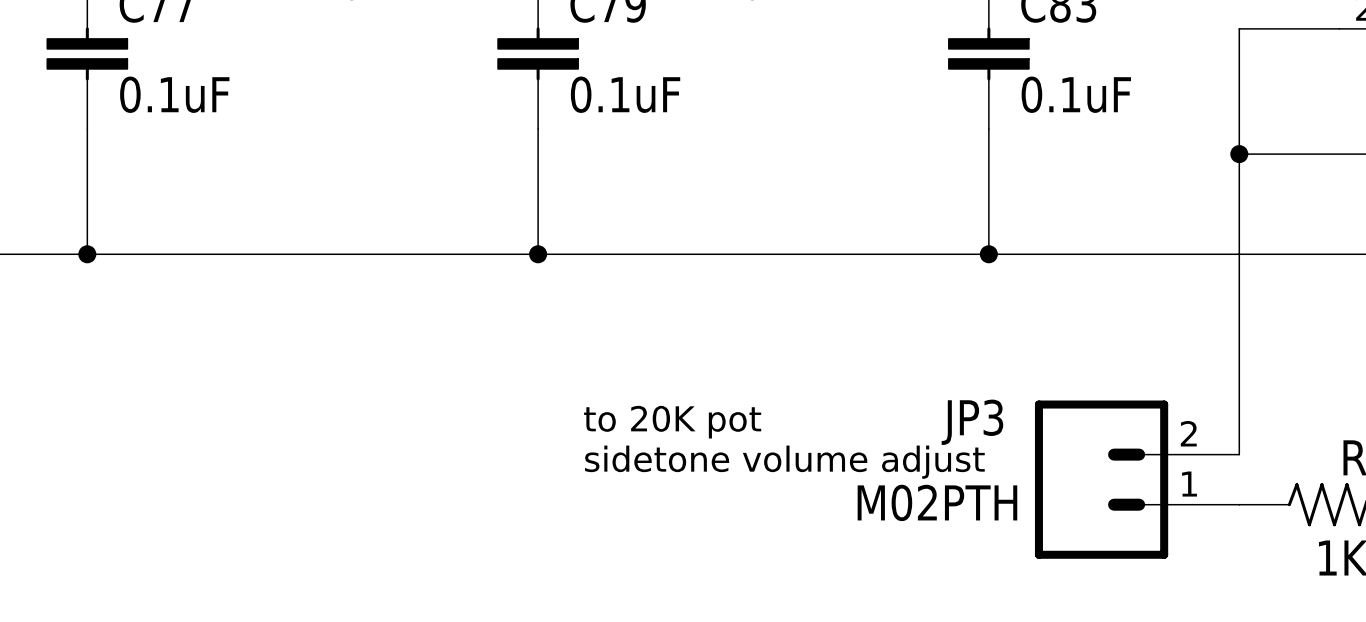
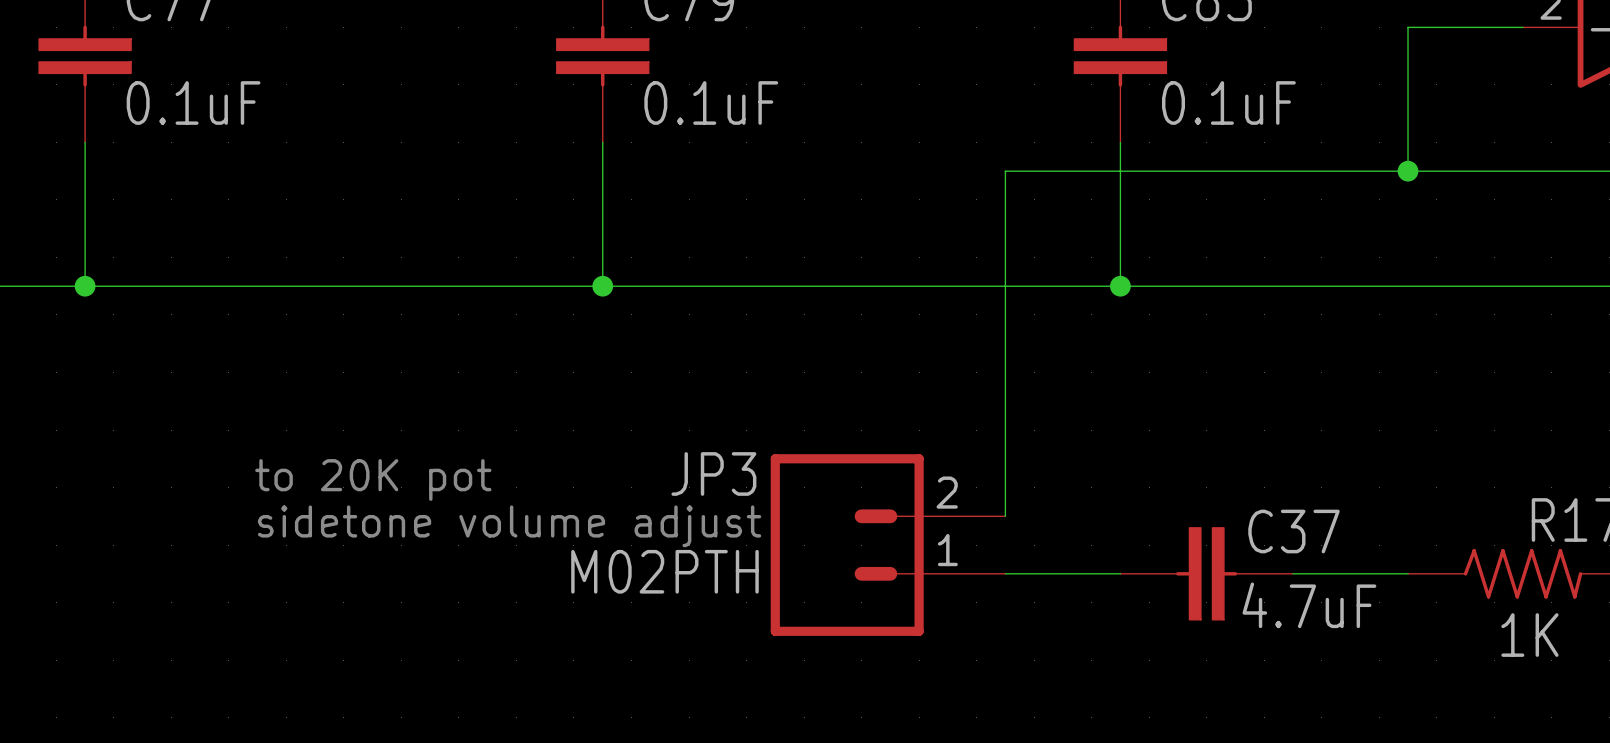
wire: (1239, 154) (1239, 454) -> (1408, 171) (1005, 171) (1005, 516)
text position: to 20K pot (672, 422) -> to 20K pot (373, 479)
text position: sidetone volume adjust (784, 462) -> sidetone volume adjust (509, 526)
JP3 position: (1137, 479) -> (888, 545)
wire: none -> (1005, 573) (1120, 573)
C37: none -> 4.7uF (1206, 573)

